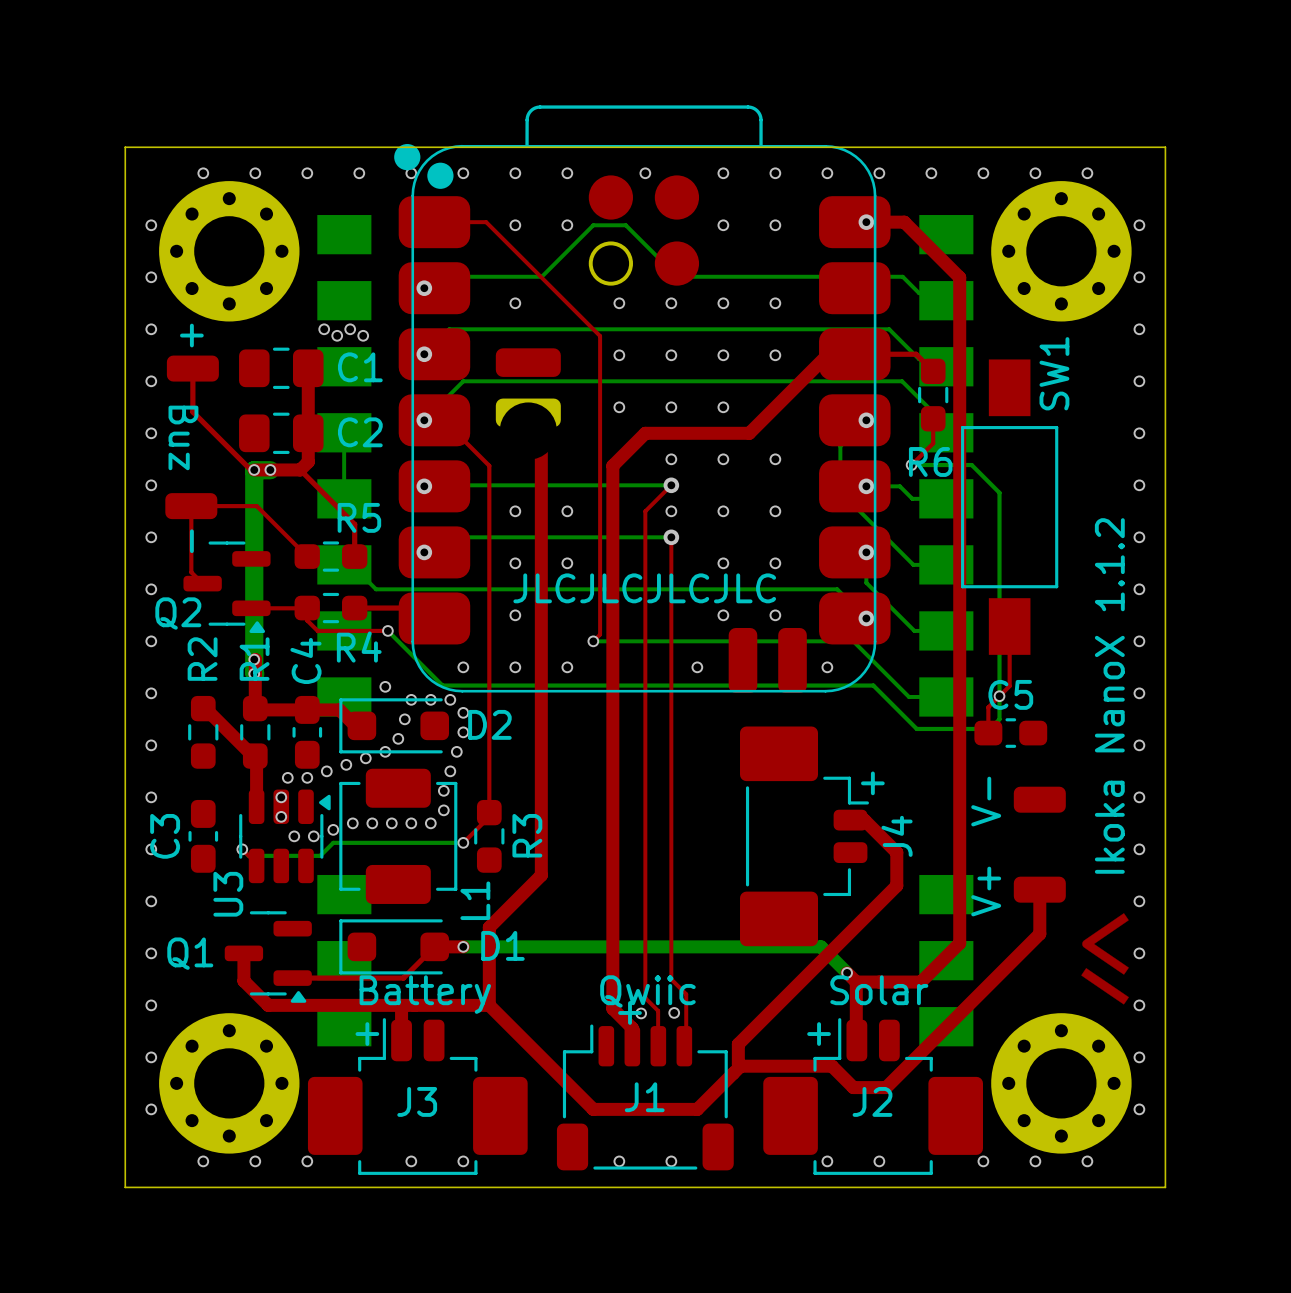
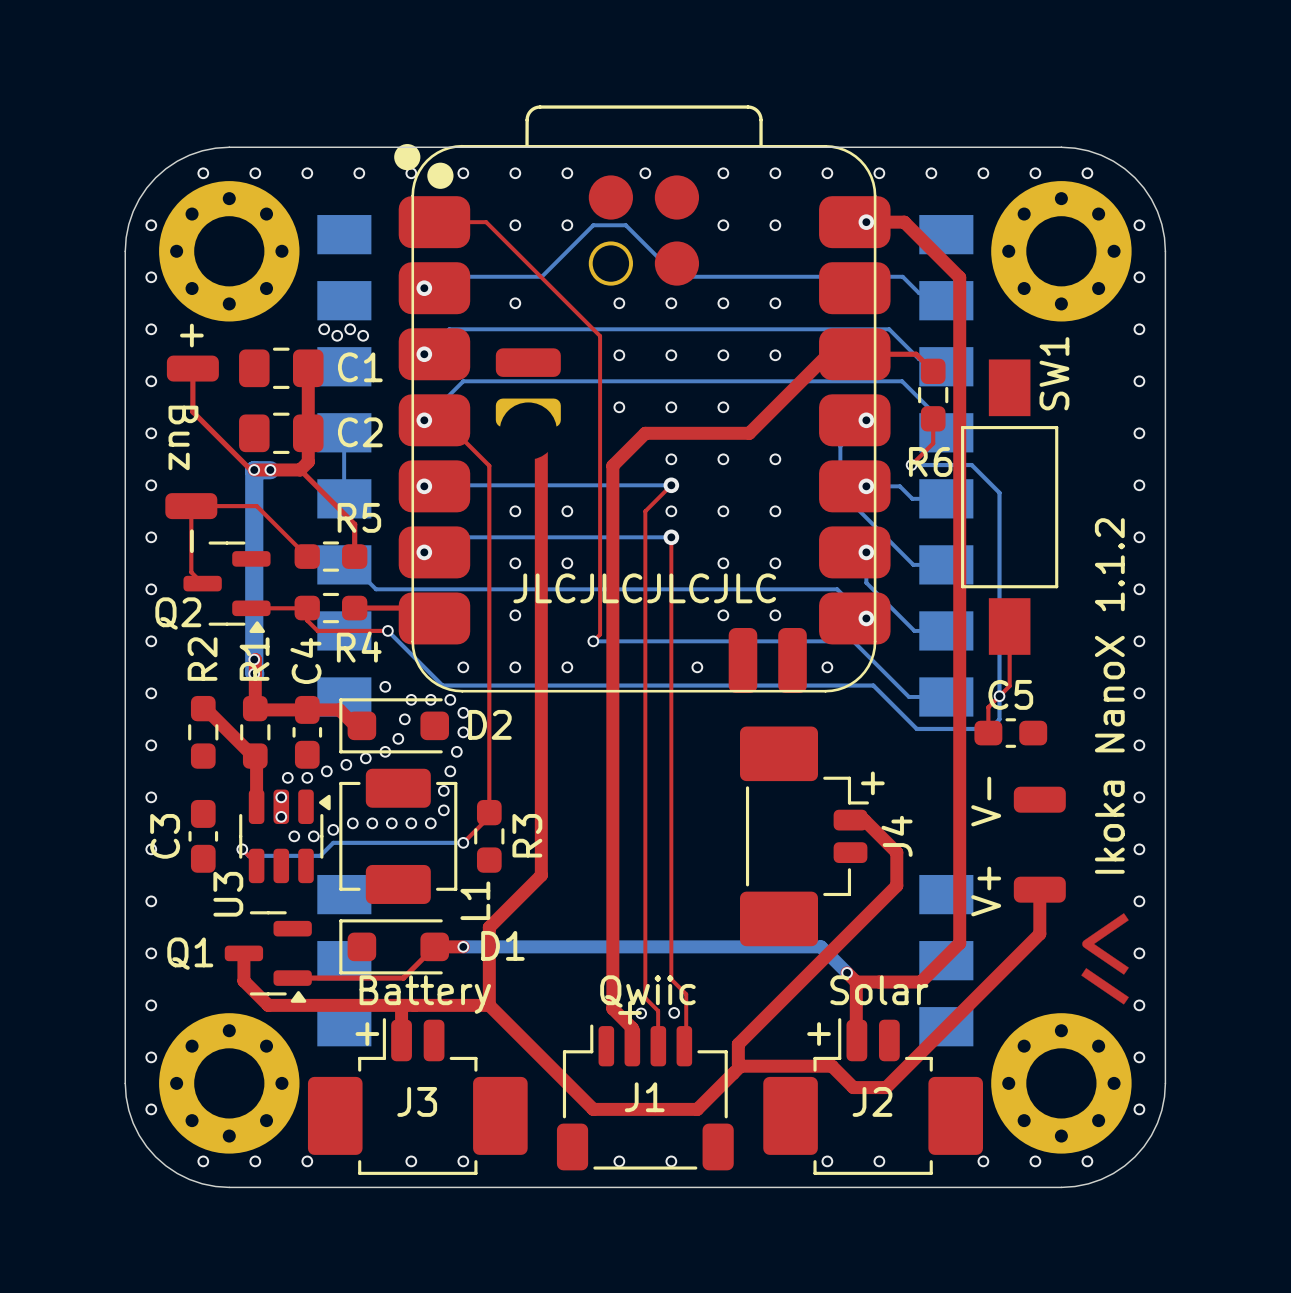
board edge: (229, 147) (125, 147) (125, 251) -> (229, 147) (202, 150) (189, 155) (177, 161) (155, 177) (139, 199) (133, 211) (128, 224) (125, 251)
board edge: (1061, 147) (1165, 147) (1165, 251) -> (1061, 147) (1074, 148) (1101, 155) (1124, 168) (1134, 177) (1143, 187) (1157, 211) (1161, 224) (1165, 251)
board edge: (125, 1083) (125, 1187) (229, 1187) -> (125, 1083) (128, 1110) (133, 1123) (139, 1135) (155, 1156) (165, 1165) (189, 1179) (215, 1186) (229, 1187)
board edge: (1165, 1083) (1165, 1187) (1061, 1187) -> (1165, 1083) (1161, 1110) (1157, 1123) (1151, 1135) (1134, 1156) (1113, 1173) (1101, 1179) (1074, 1186) (1061, 1187)

